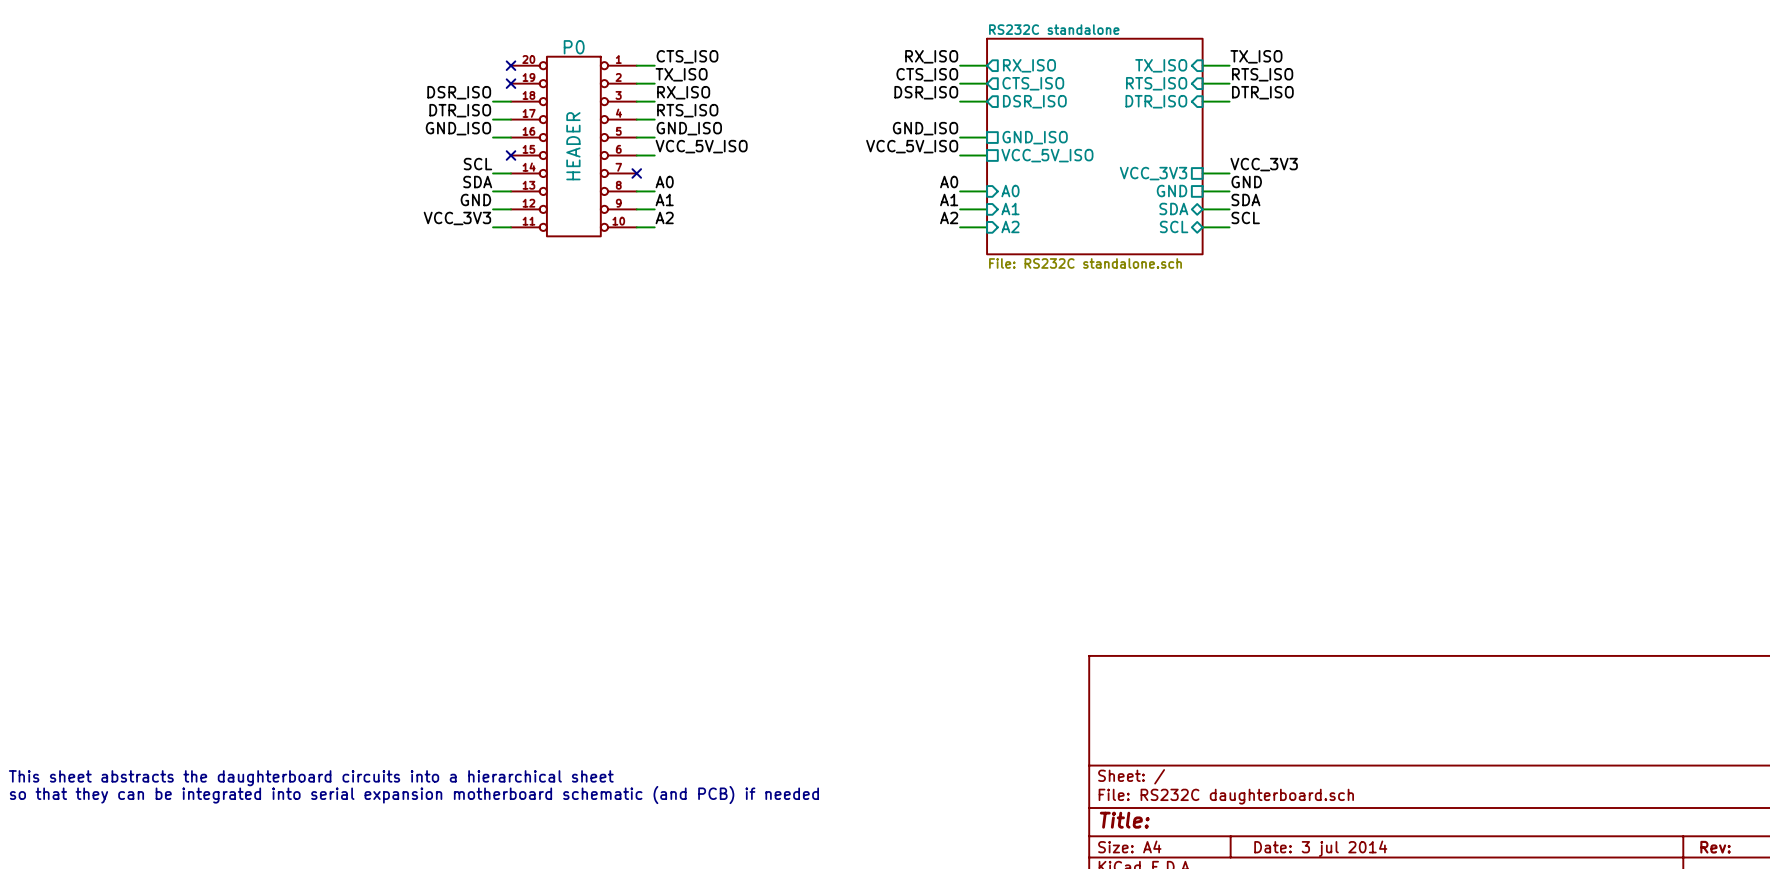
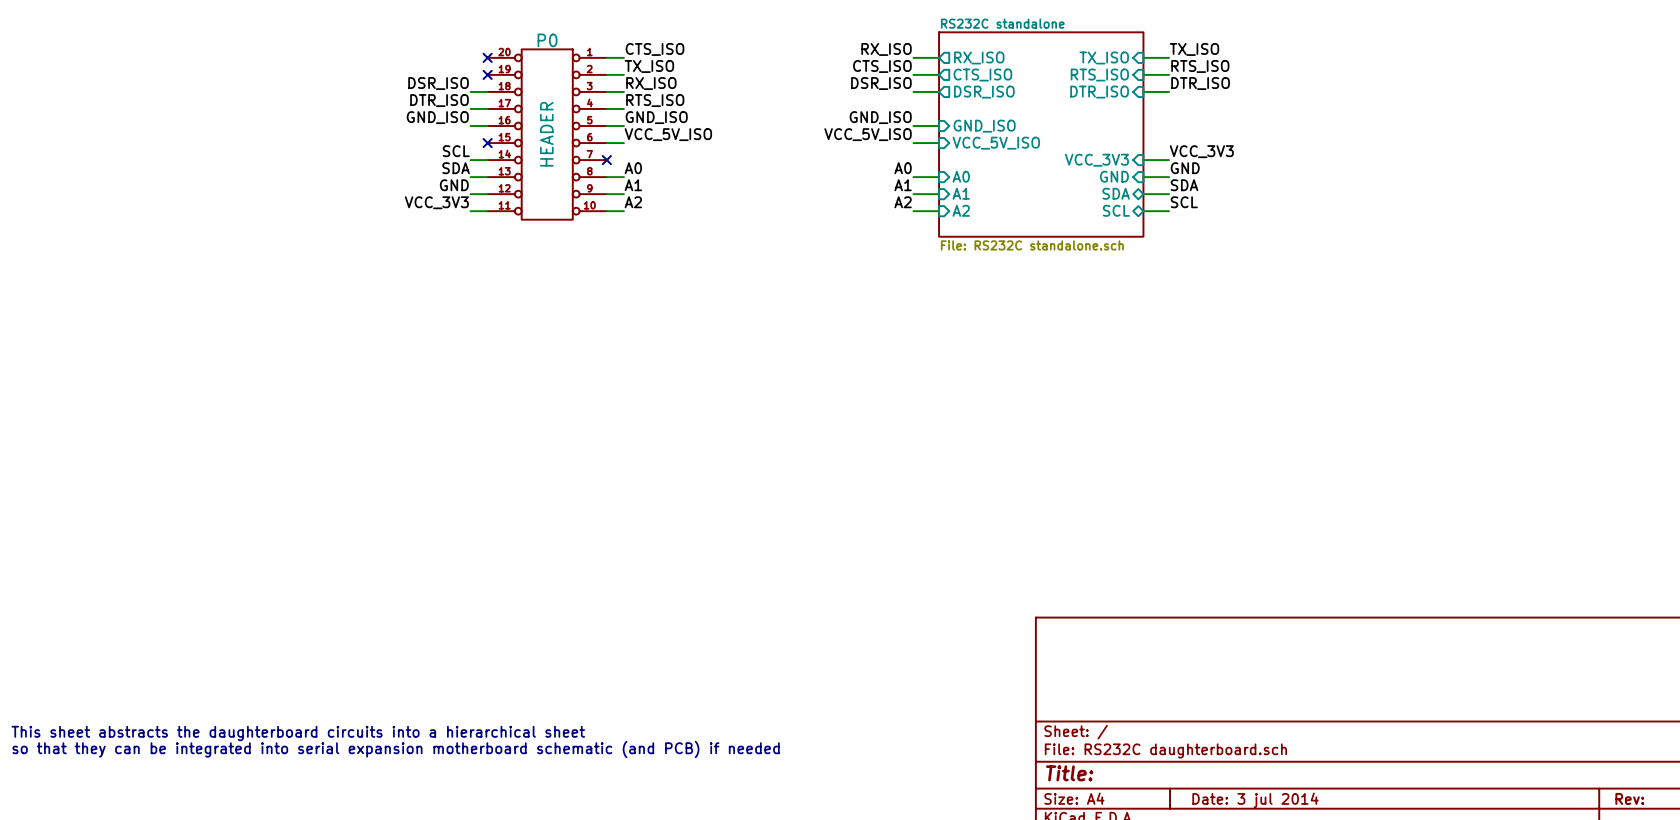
sheet pin shape: passive (1035, 137) -> input (984, 126)
sheet pin shape: passive (1047, 155) -> input (996, 143)
sheet pin shape: passive (1153, 173) -> input (1096, 160)
sheet pin shape: passive (1172, 191) -> input (1114, 176)

